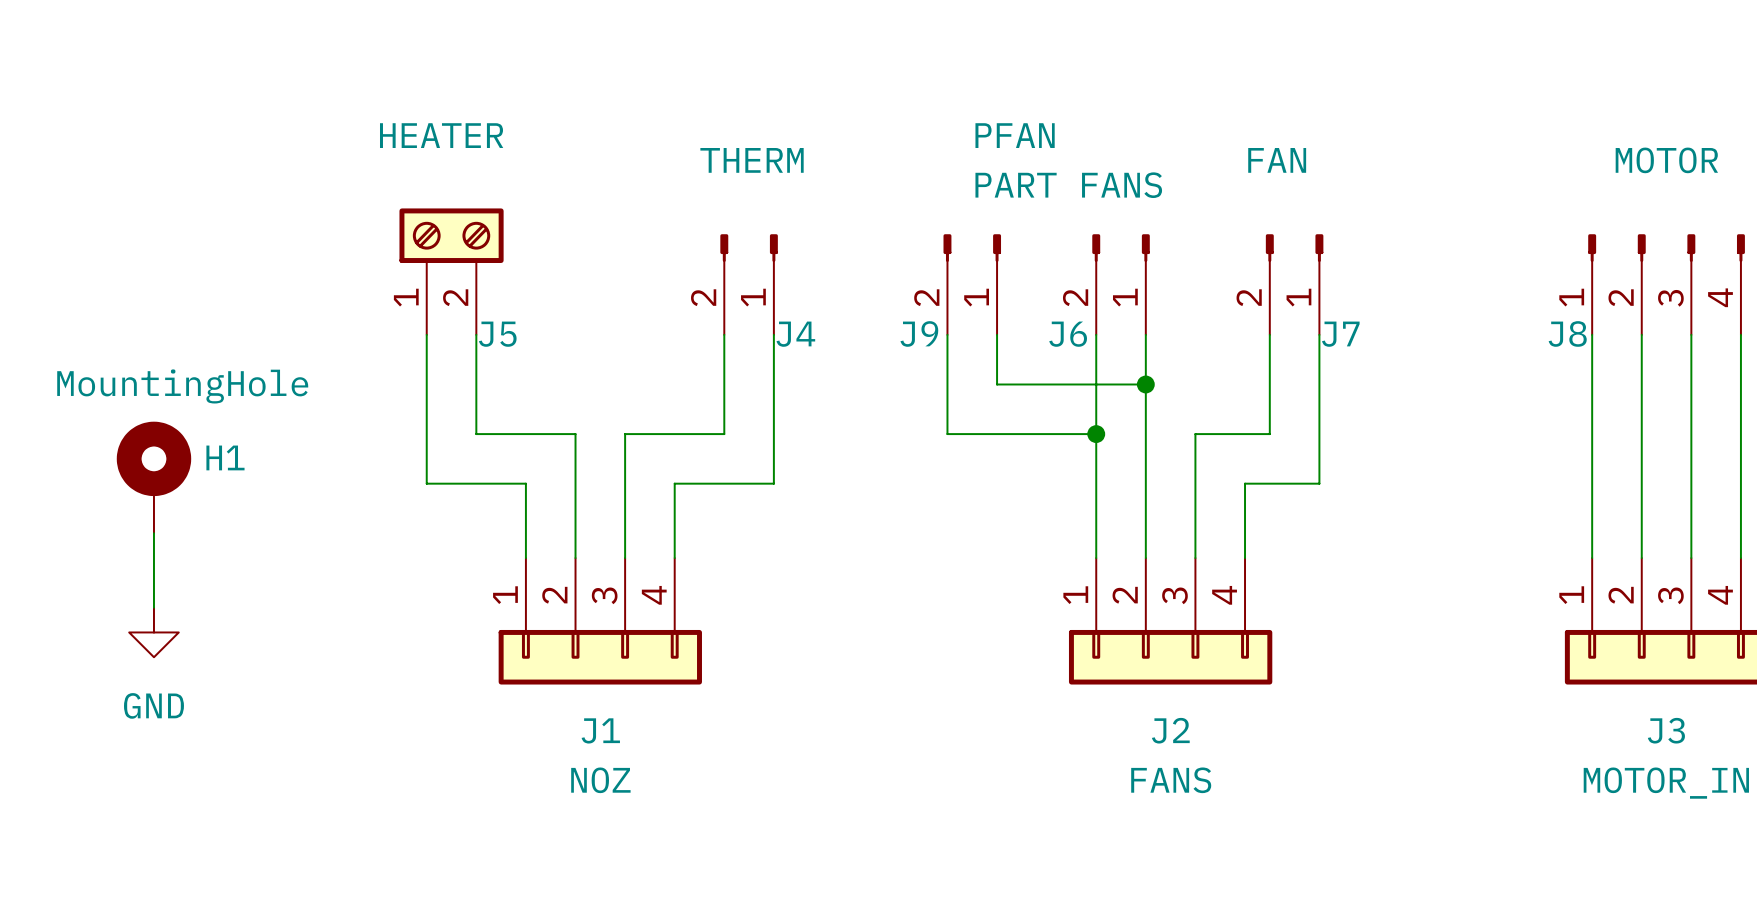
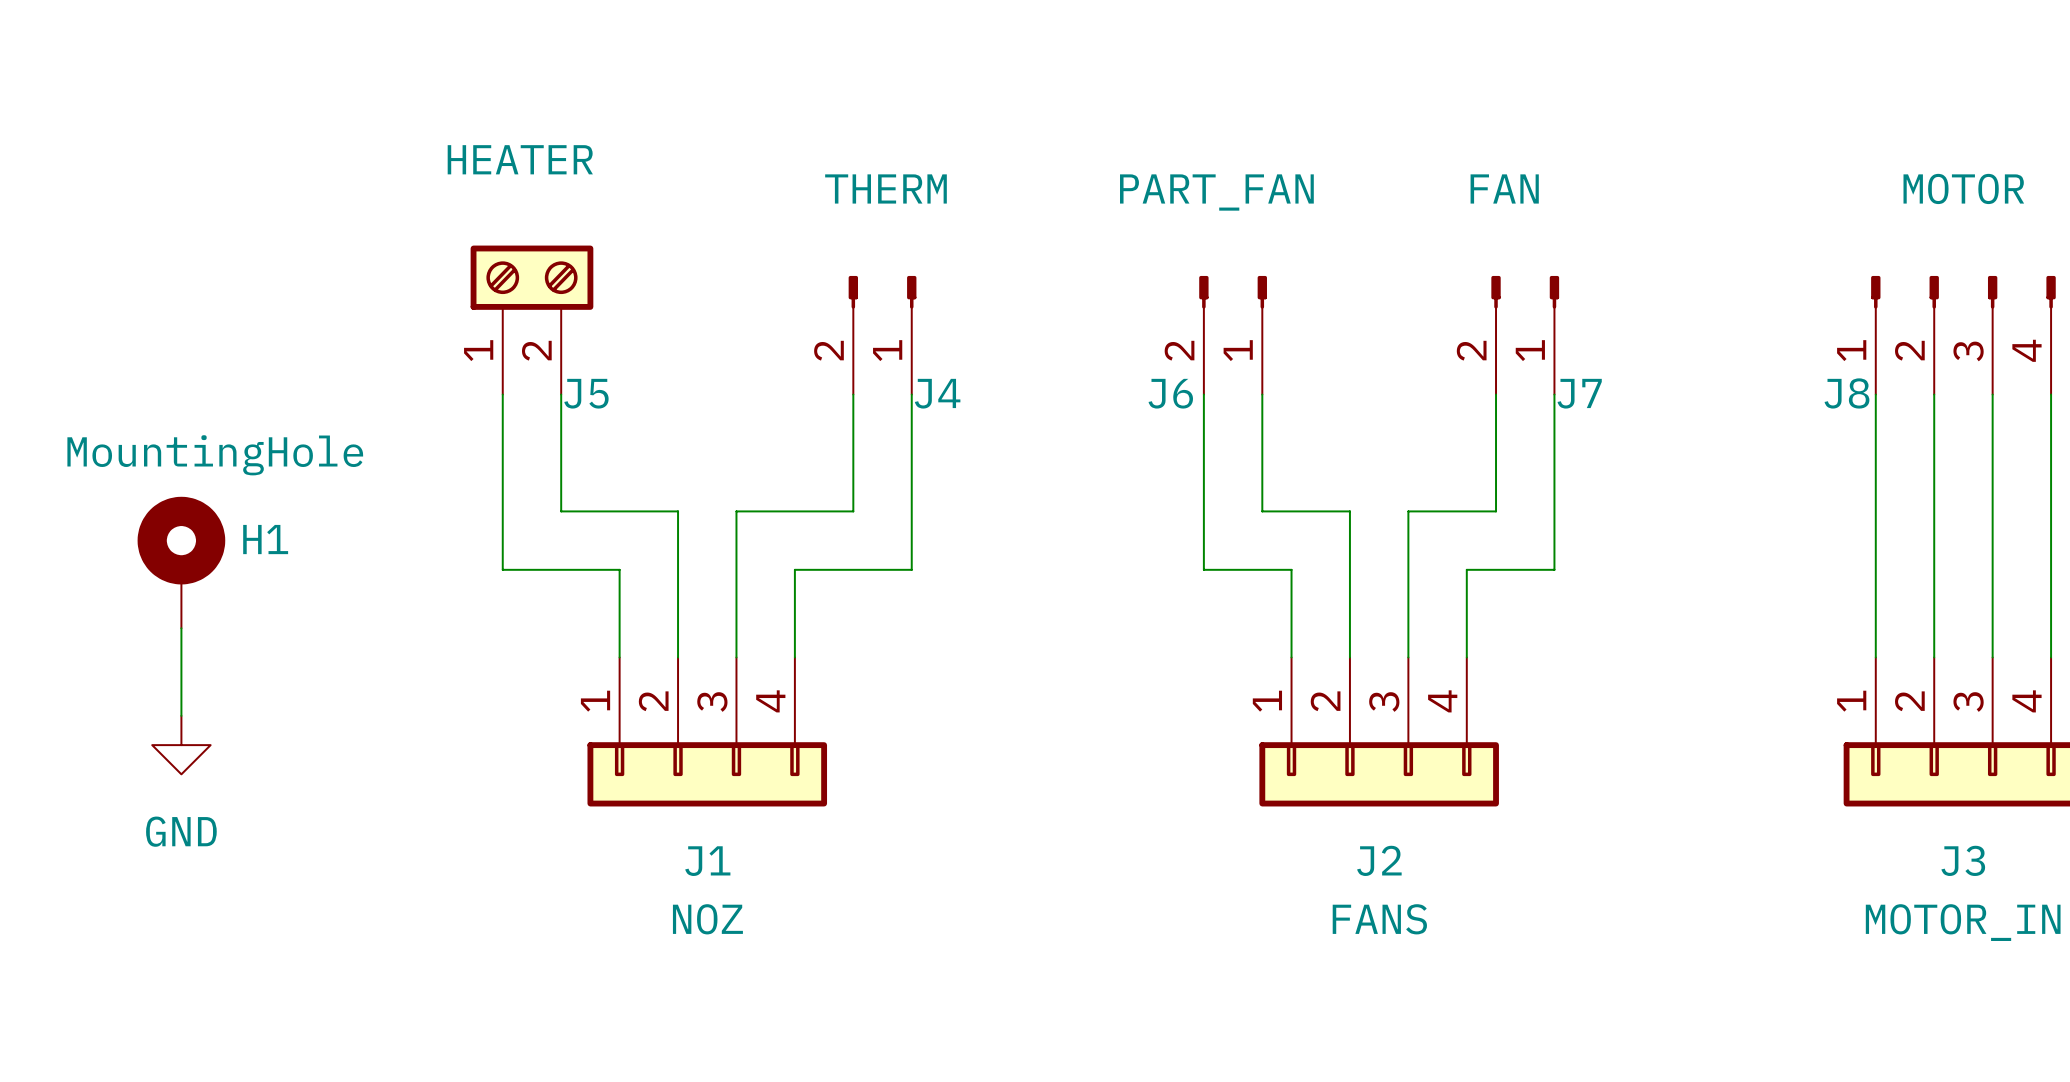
J6 value: PART FANS (1068, 185) -> PART_FAN (1216, 192)
J9: PFAN (972, 284) -> none
J6 position: (1121, 284) -> (1233, 335)
wire: (947, 334) (947, 434) (1071, 434) -> (1262, 394) (1262, 511)
wire: (997, 334) (997, 384) (1145, 384) -> none
wire: (1096, 334) (1096, 483) -> (1203, 394) (1203, 569) (1291, 569)
wire: (1145, 334) (1145, 434) -> (1291, 511) (1349, 511)
junction: (1145, 384) -> none
junction: (1096, 434) -> none

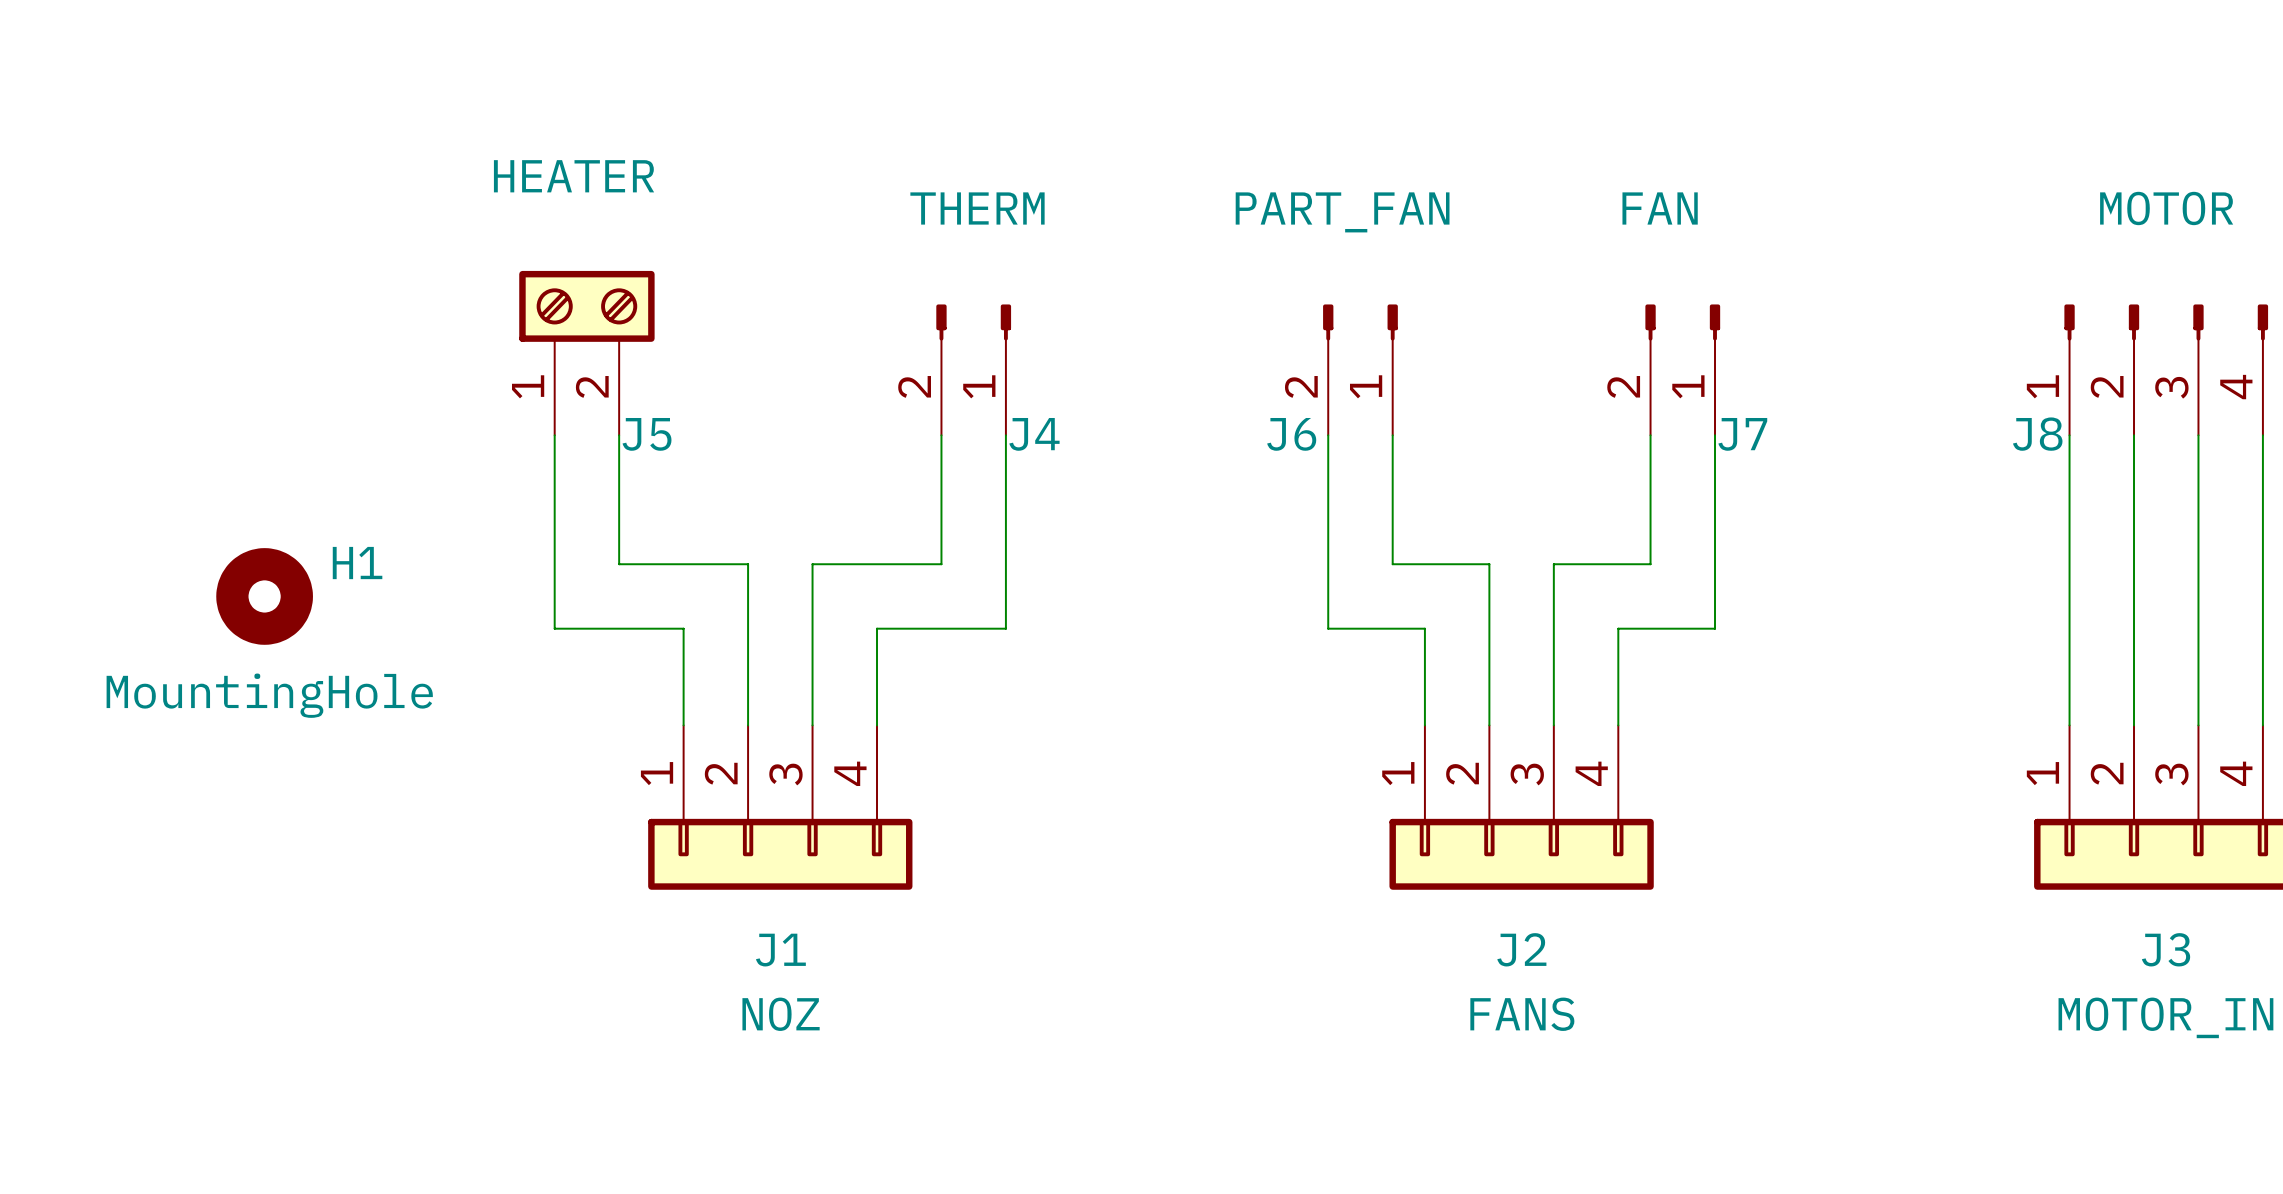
H1 value position: MountingHole (215, 455) -> MountingHole (269, 695)
H1 symbol: [137, 496, 226, 629] -> [216, 548, 313, 645]
wire: (181, 628) (181, 715) -> none
power symbol: GND (181, 745) -> none

